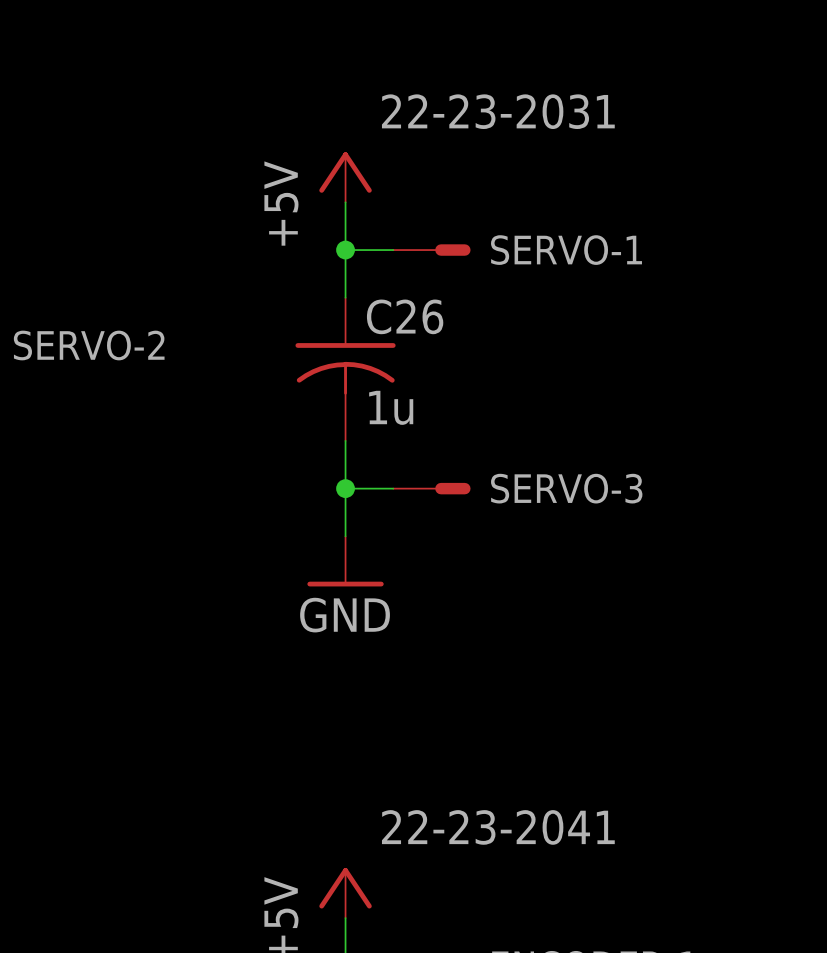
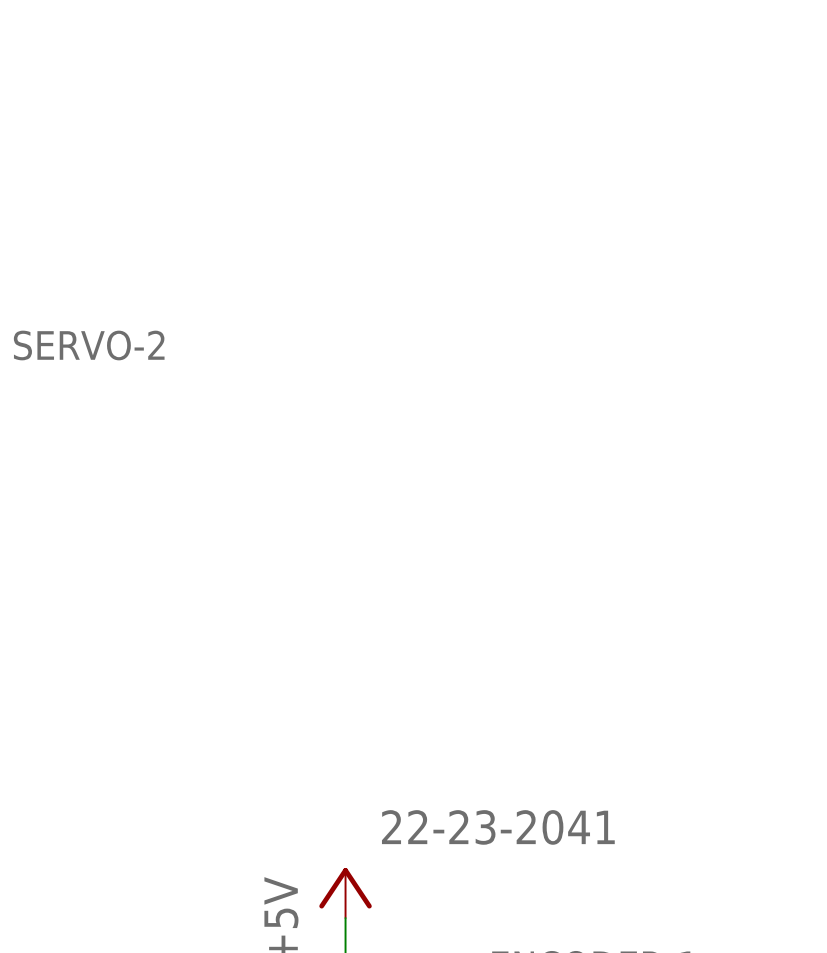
power symbol: +5V (345, 177) -> none
wire: (345, 202) (345, 297) -> none
wire: (345, 250) (393, 250) -> none
junction: (345, 250) -> none
SERVO-1: 22-23-2031 (431, 250) -> none
C26: 1u (345, 369) -> none
wire: (345, 440) (345, 536) -> none
wire: (345, 488) (393, 488) -> none
junction: (345, 488) -> none
SERVO-3: (431, 488) -> none
power symbol: GND (345, 561) -> none

